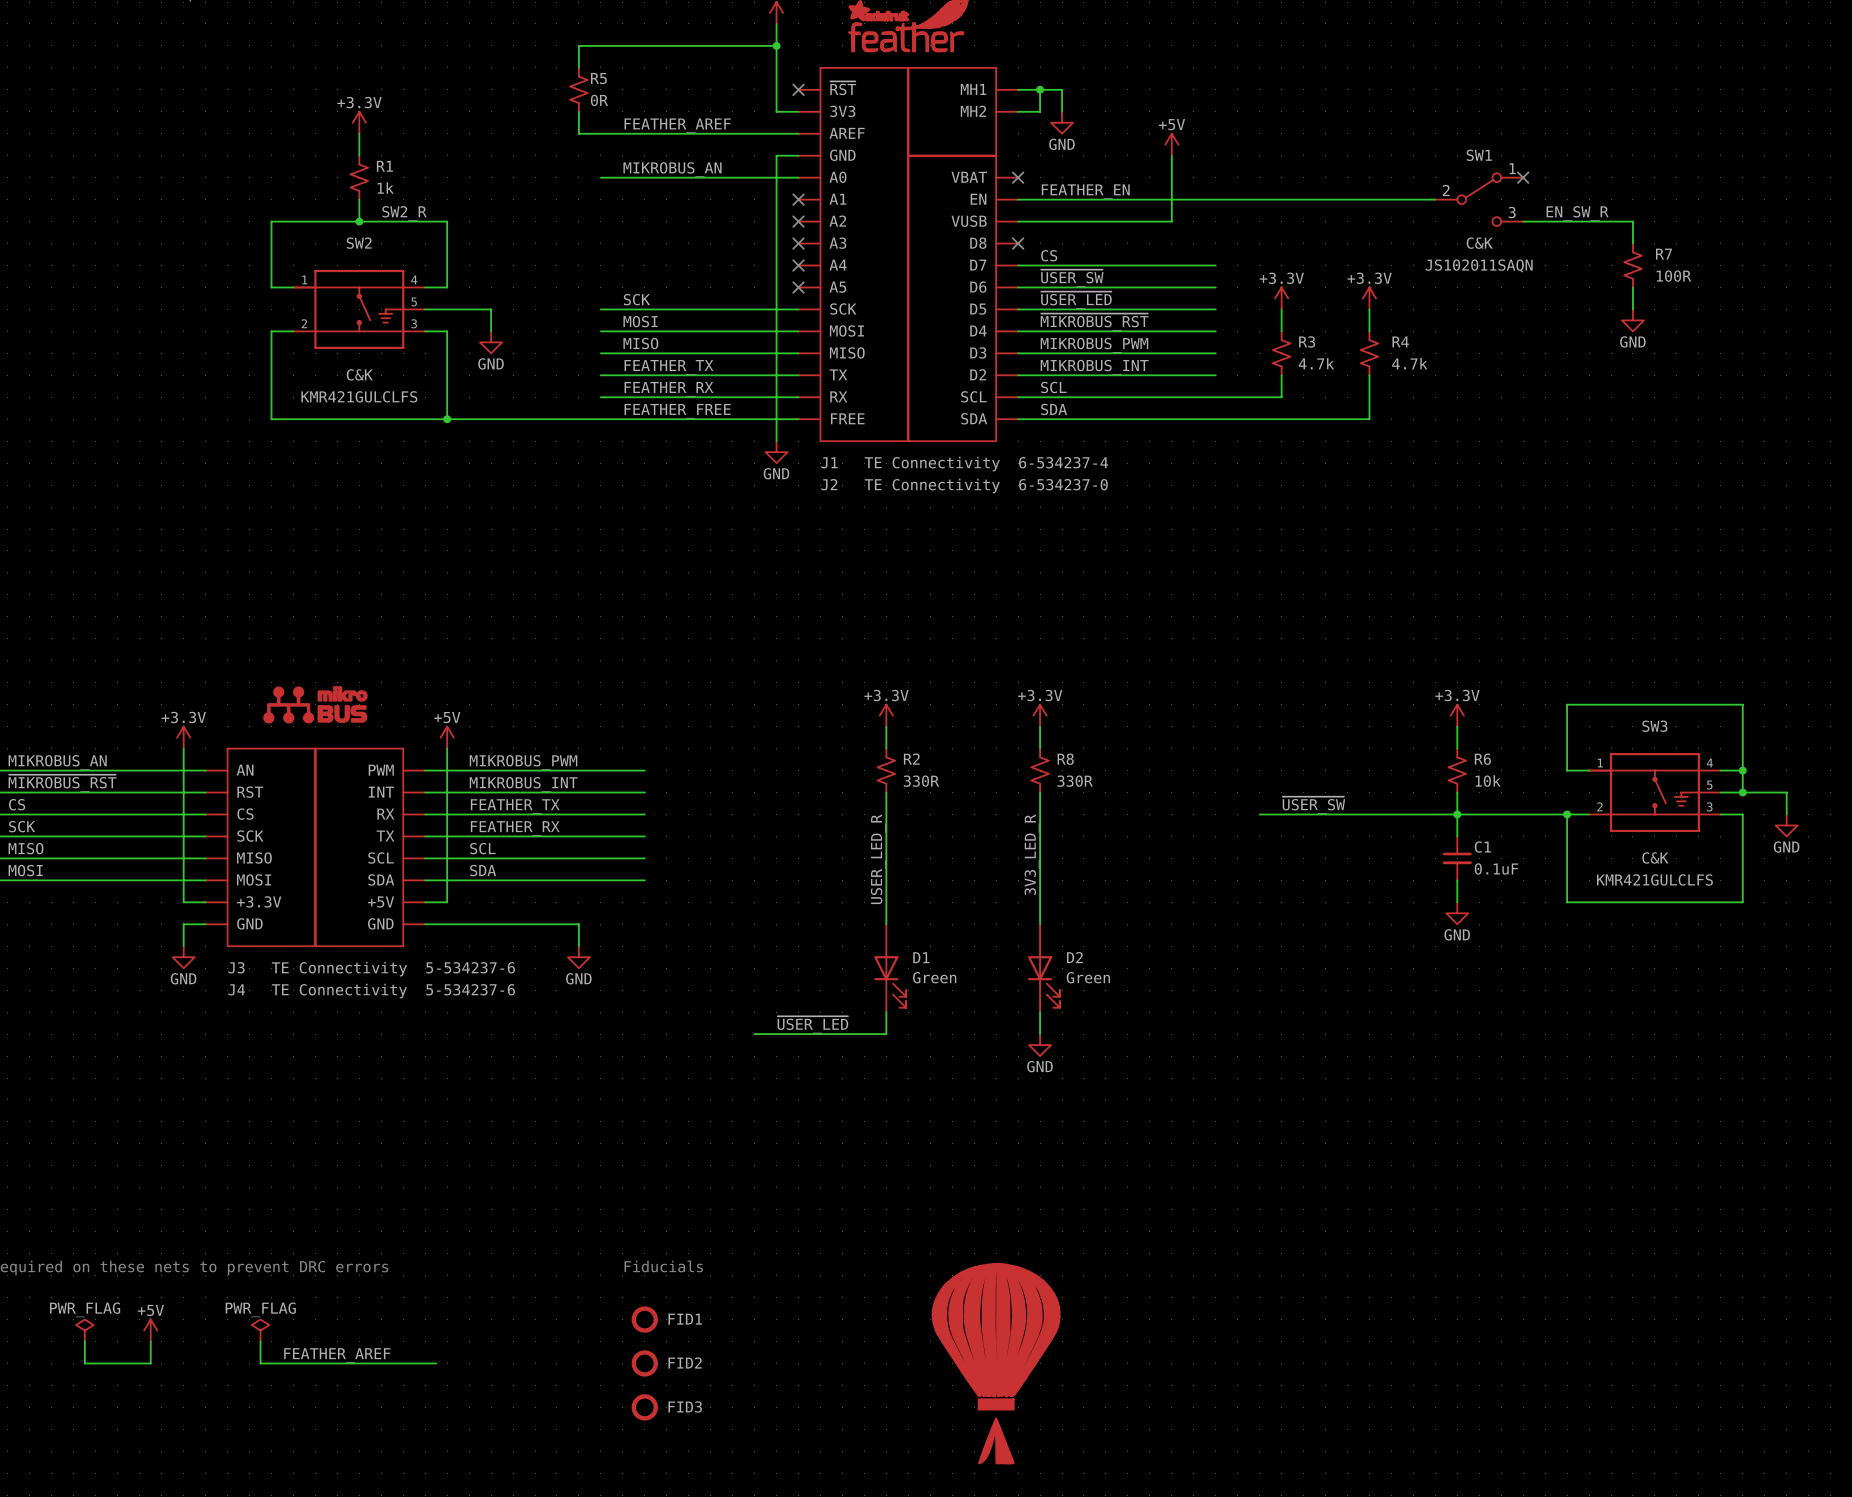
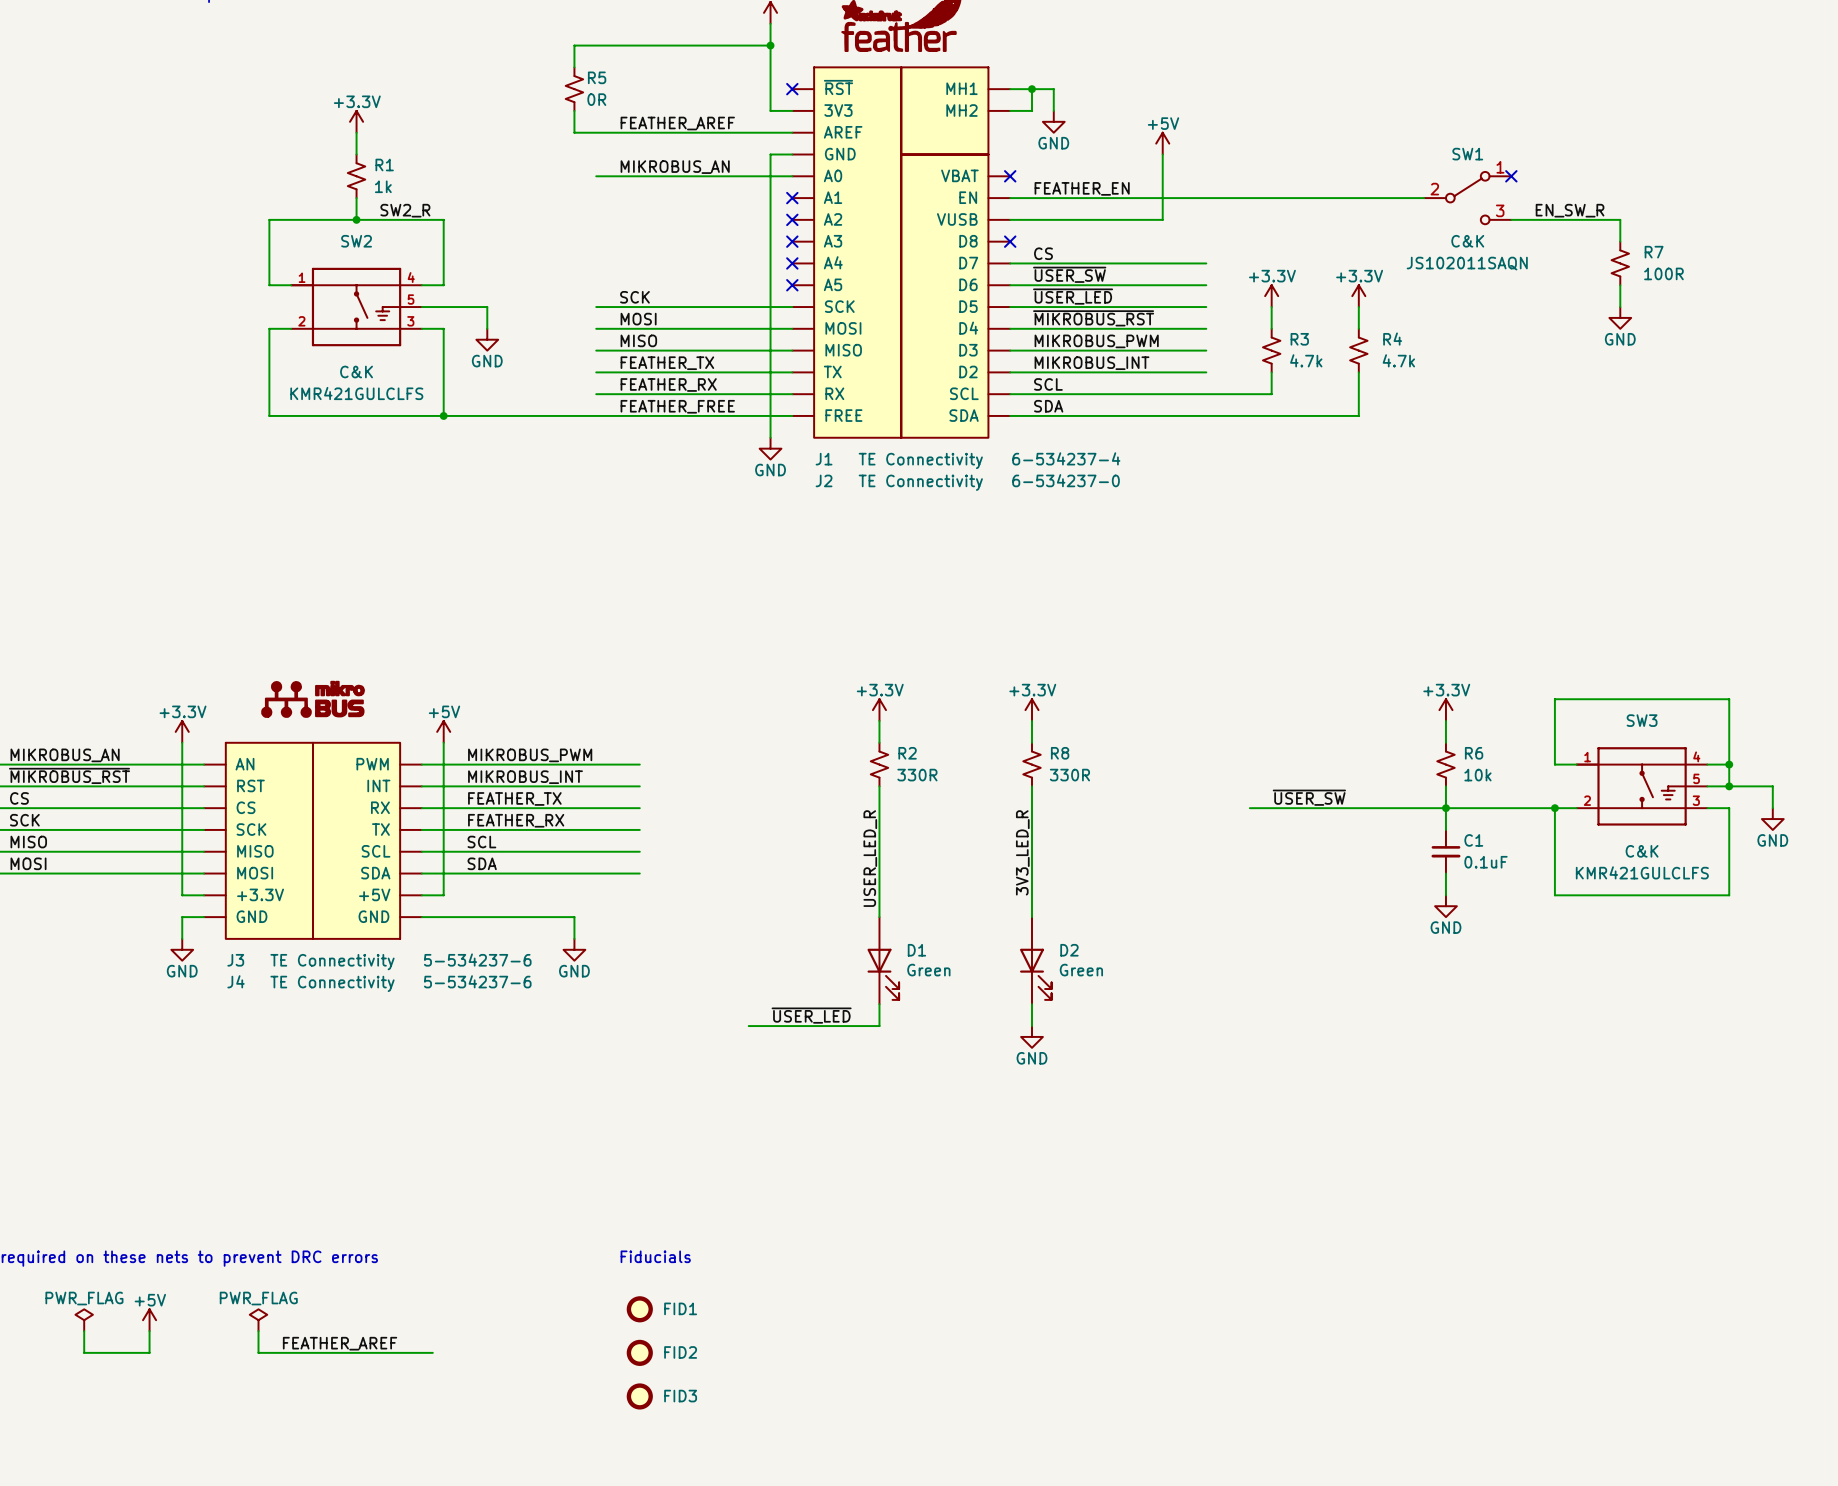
part: (996, 1363) -> none

